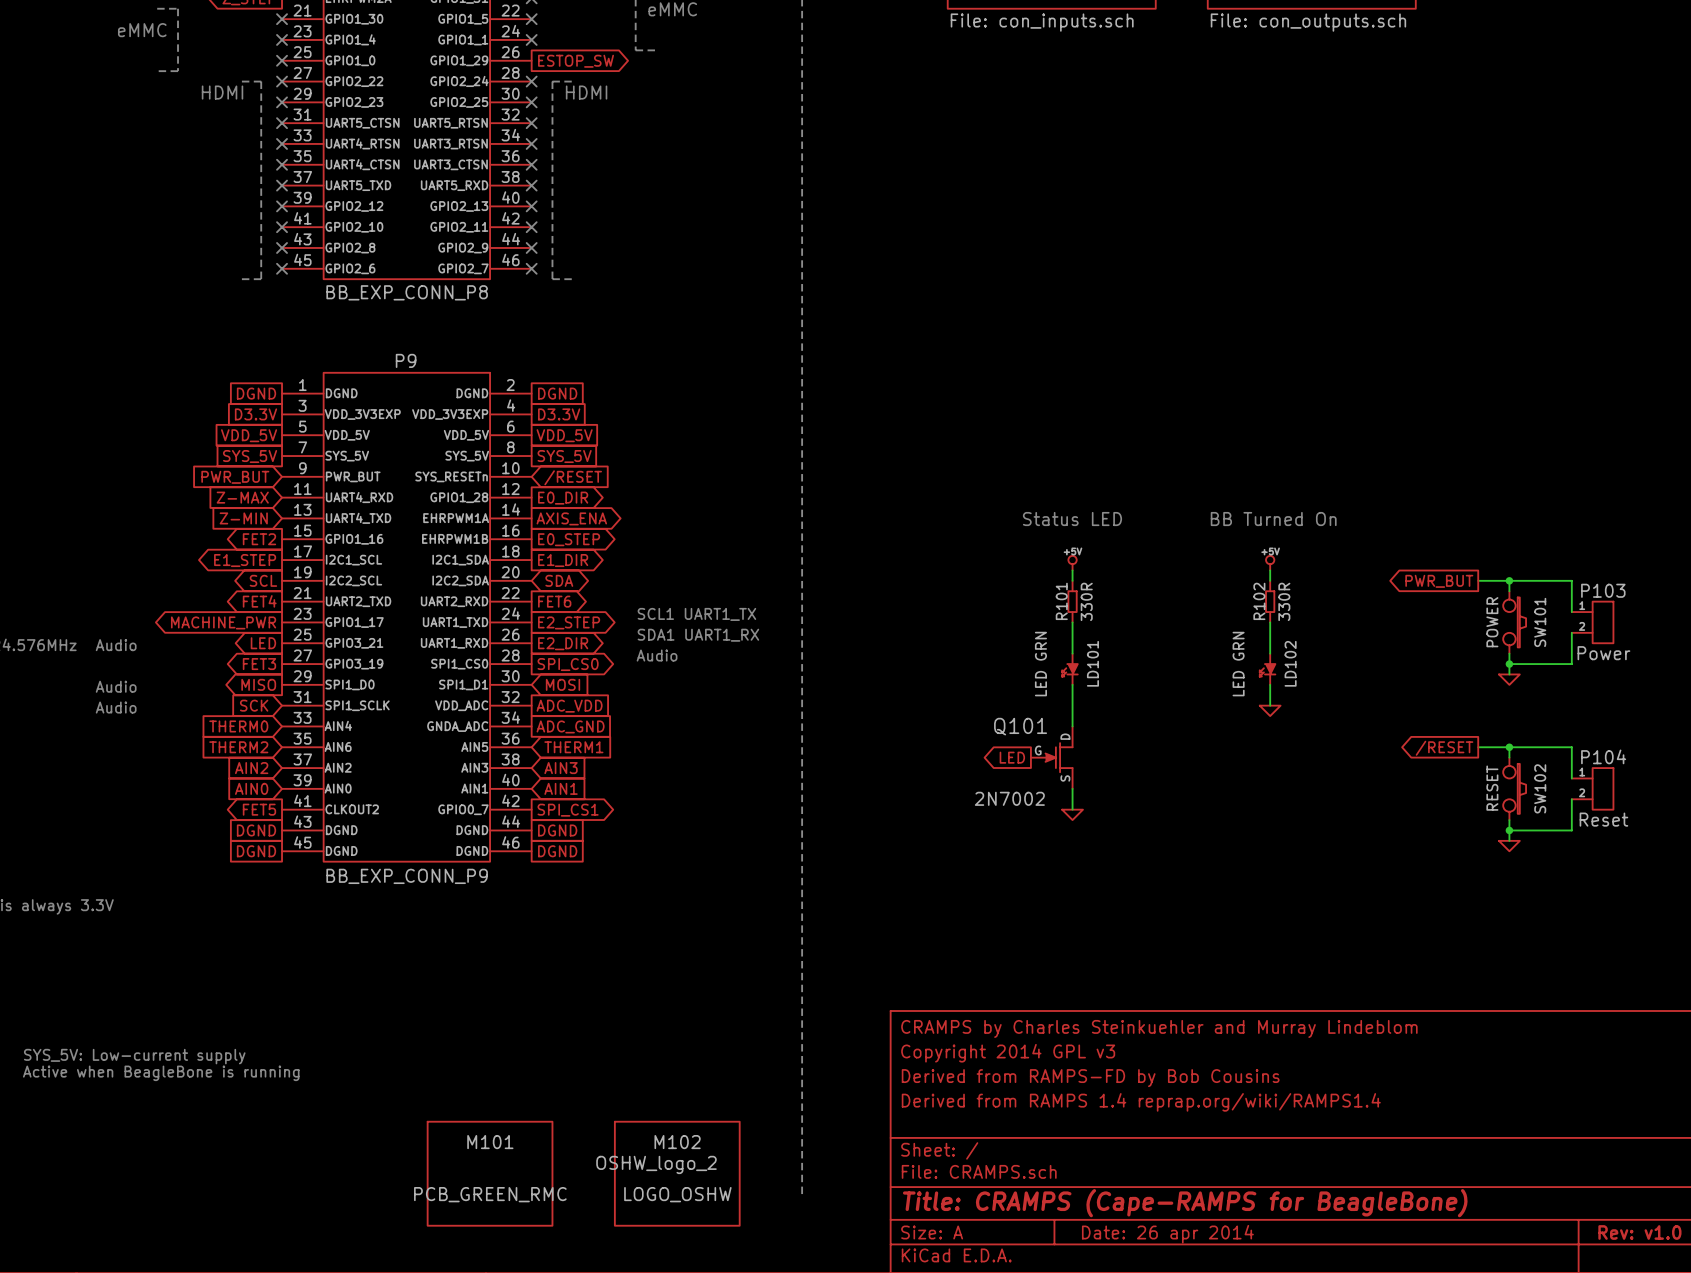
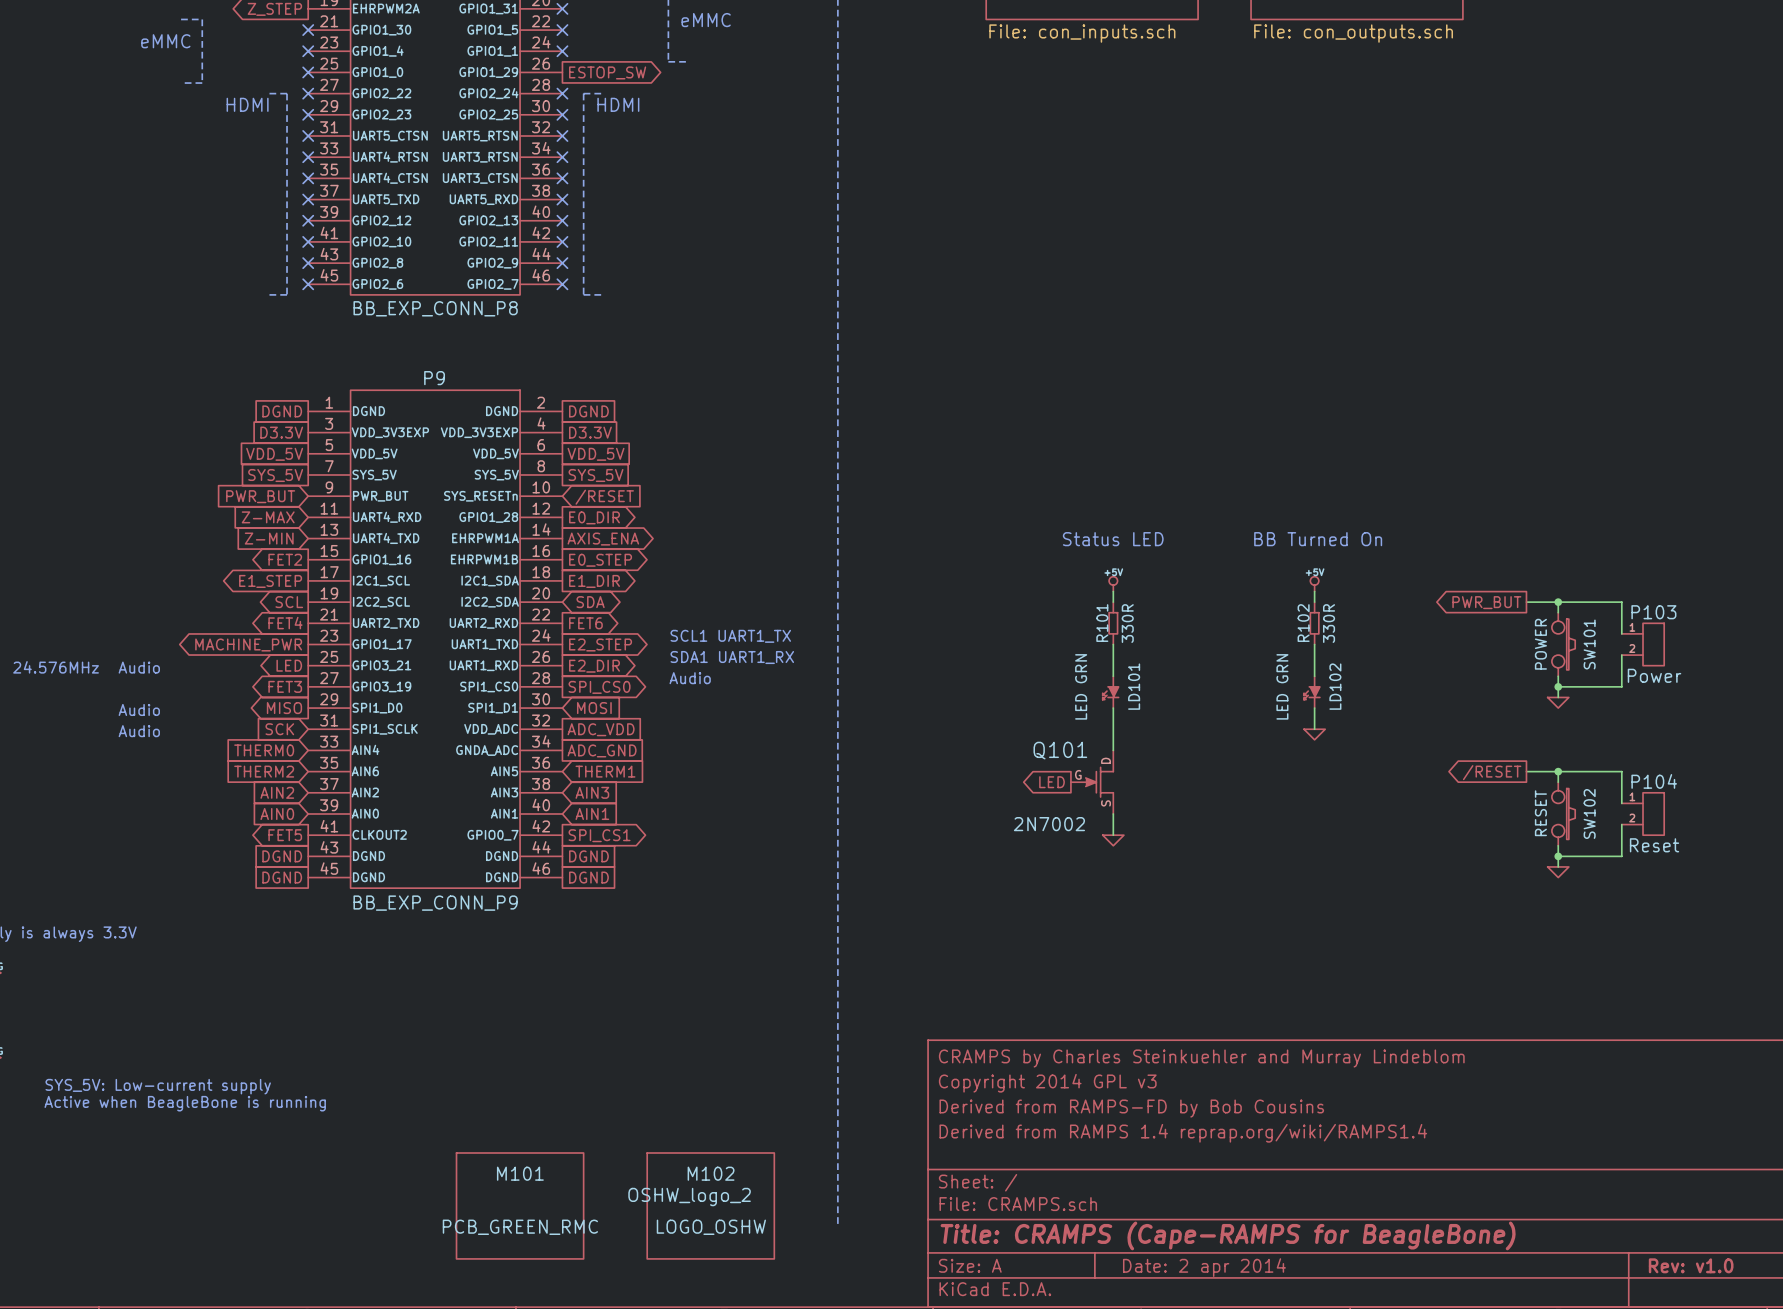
title block: Date: 26 apr 2014 (1167, 1234) -> Date: 2 apr 2014 (1204, 1267)

